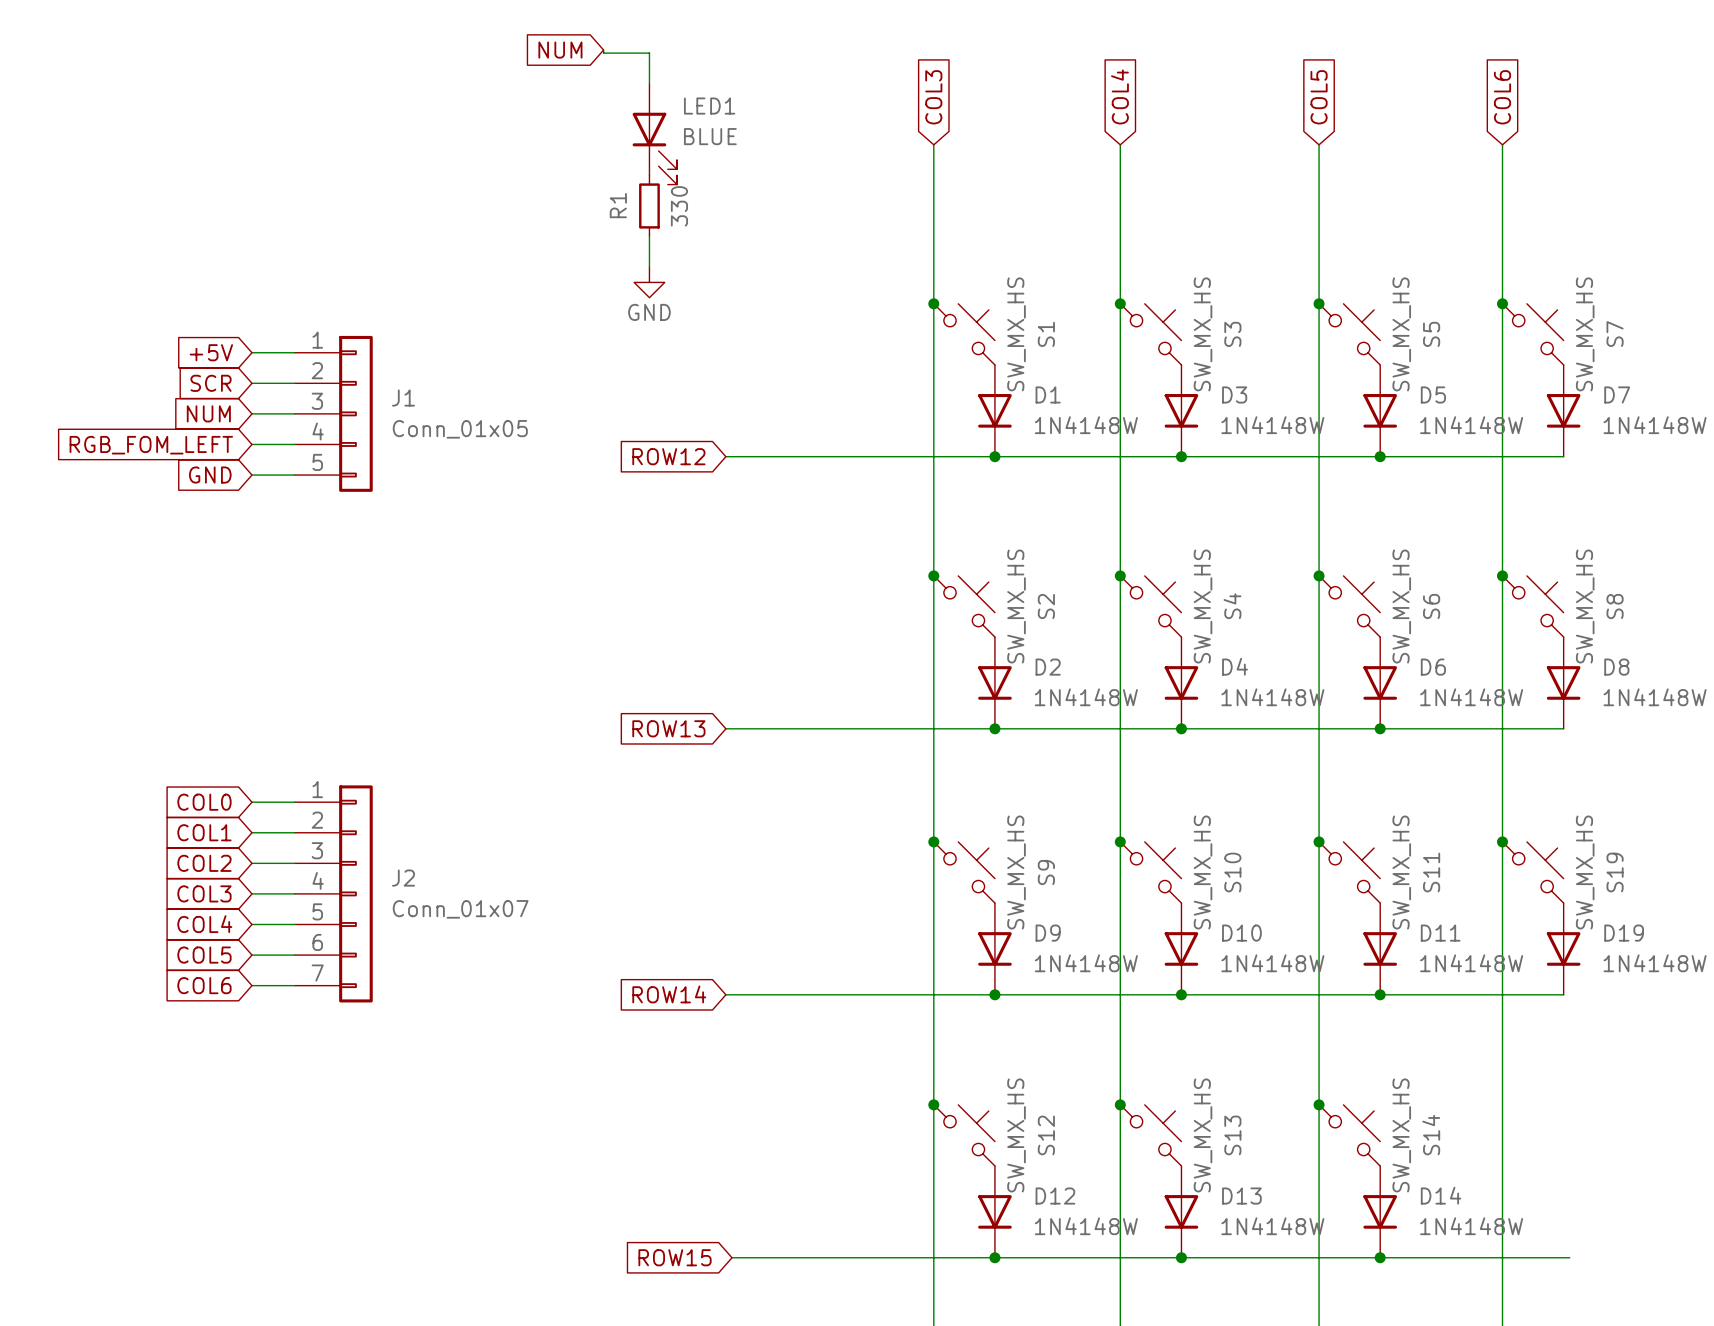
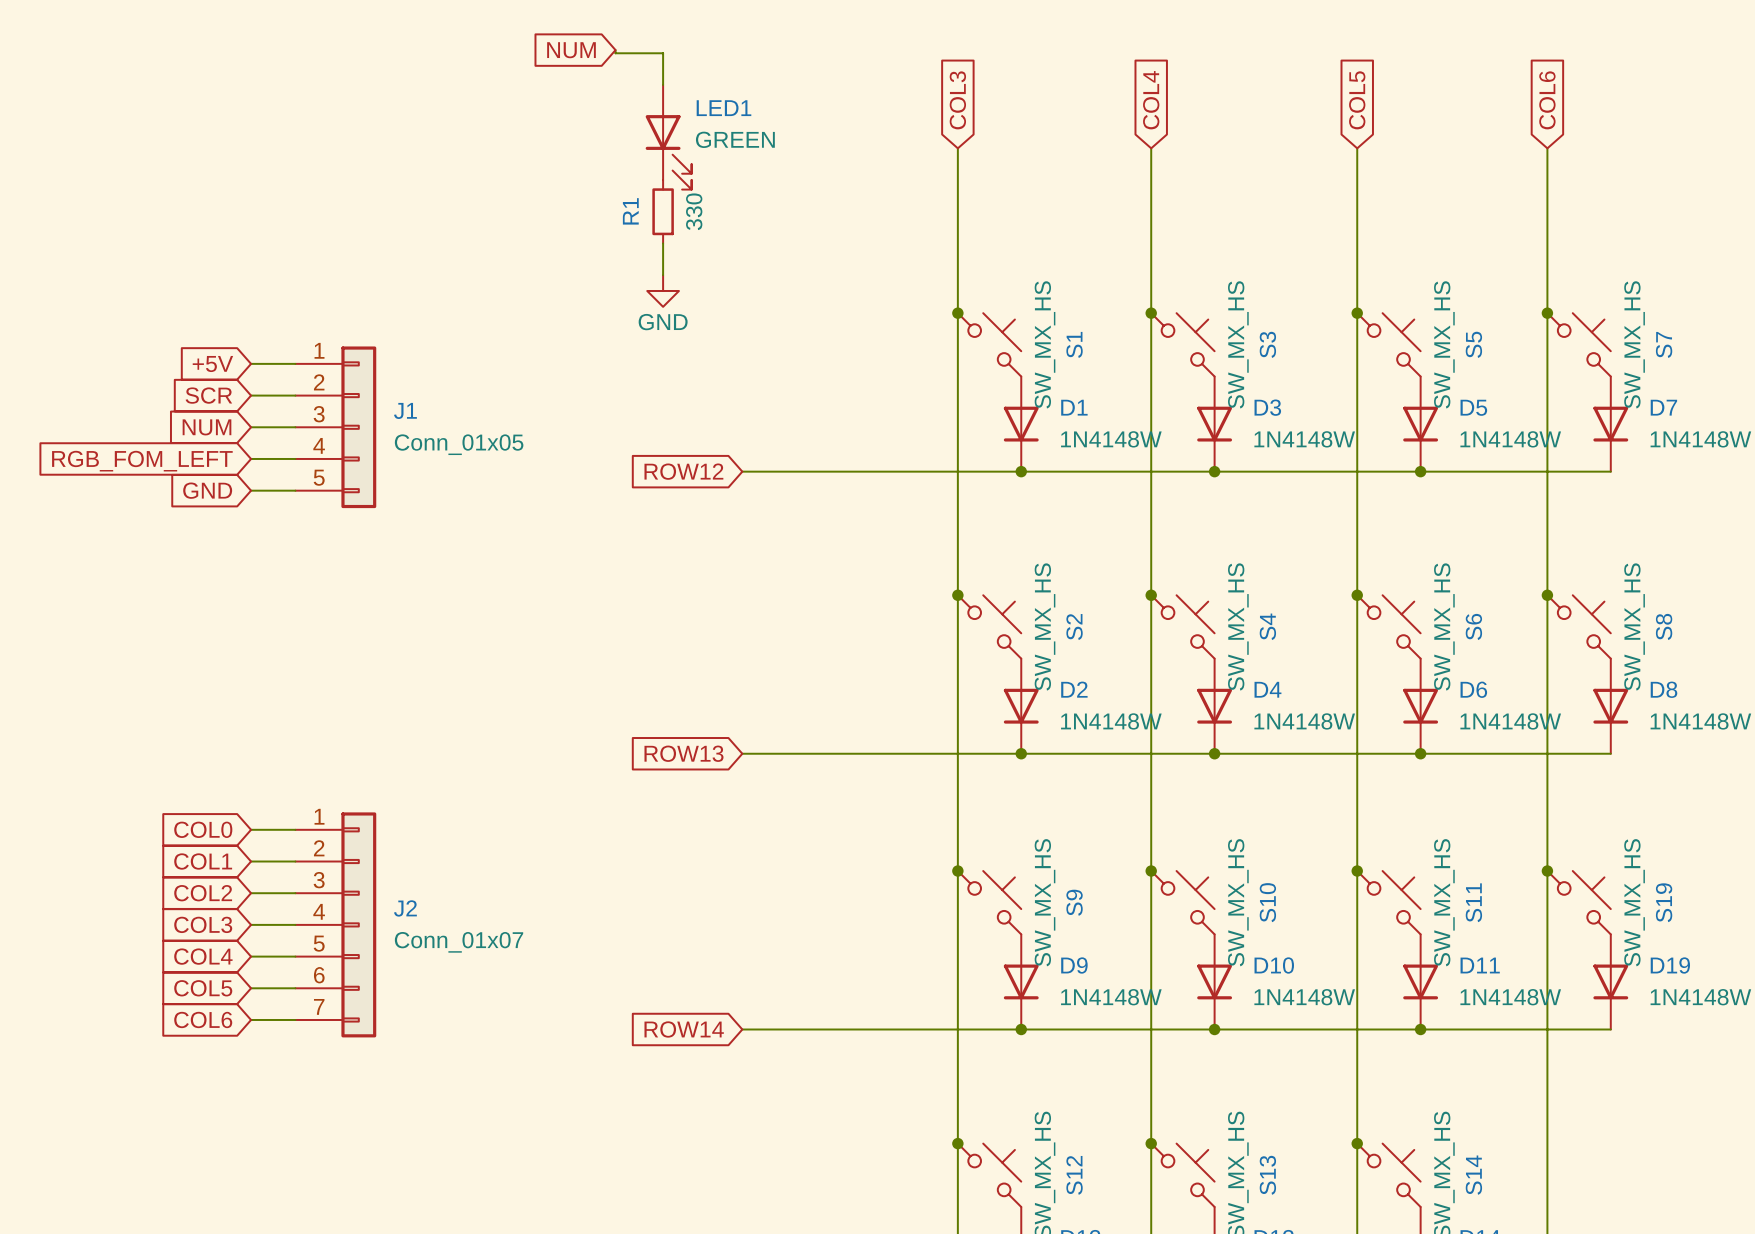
LED1 value: BLUE (710, 136) -> GREEN (735, 139)

